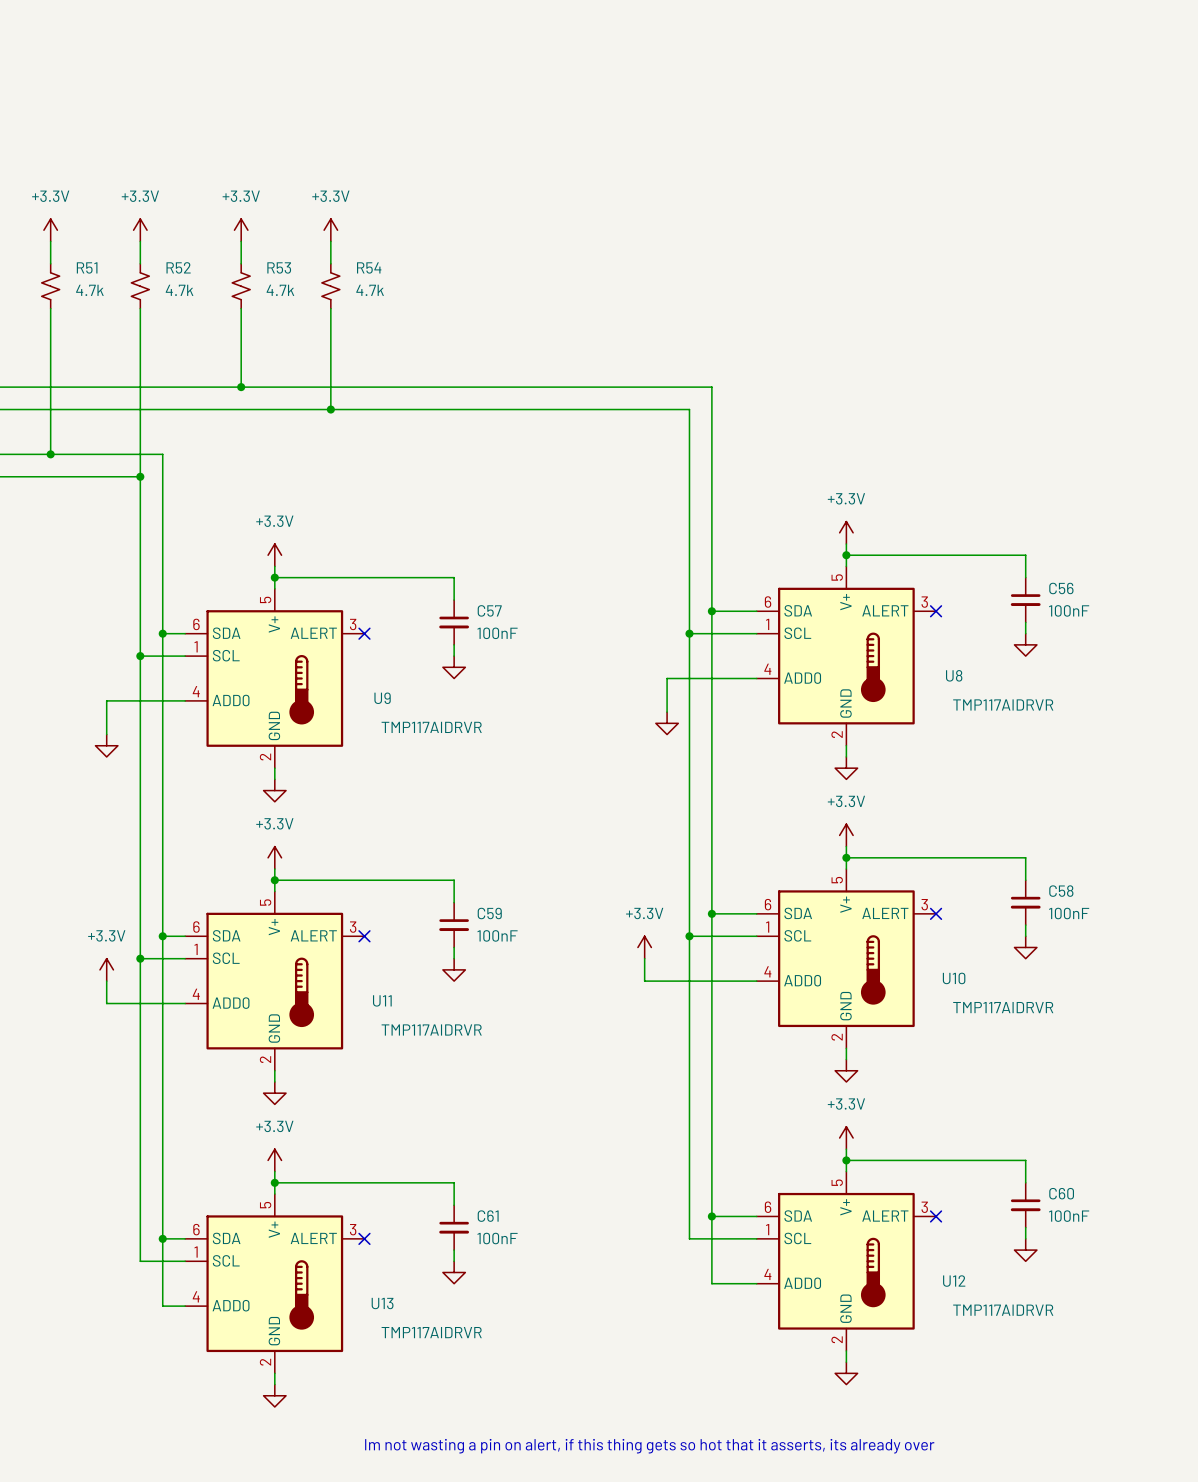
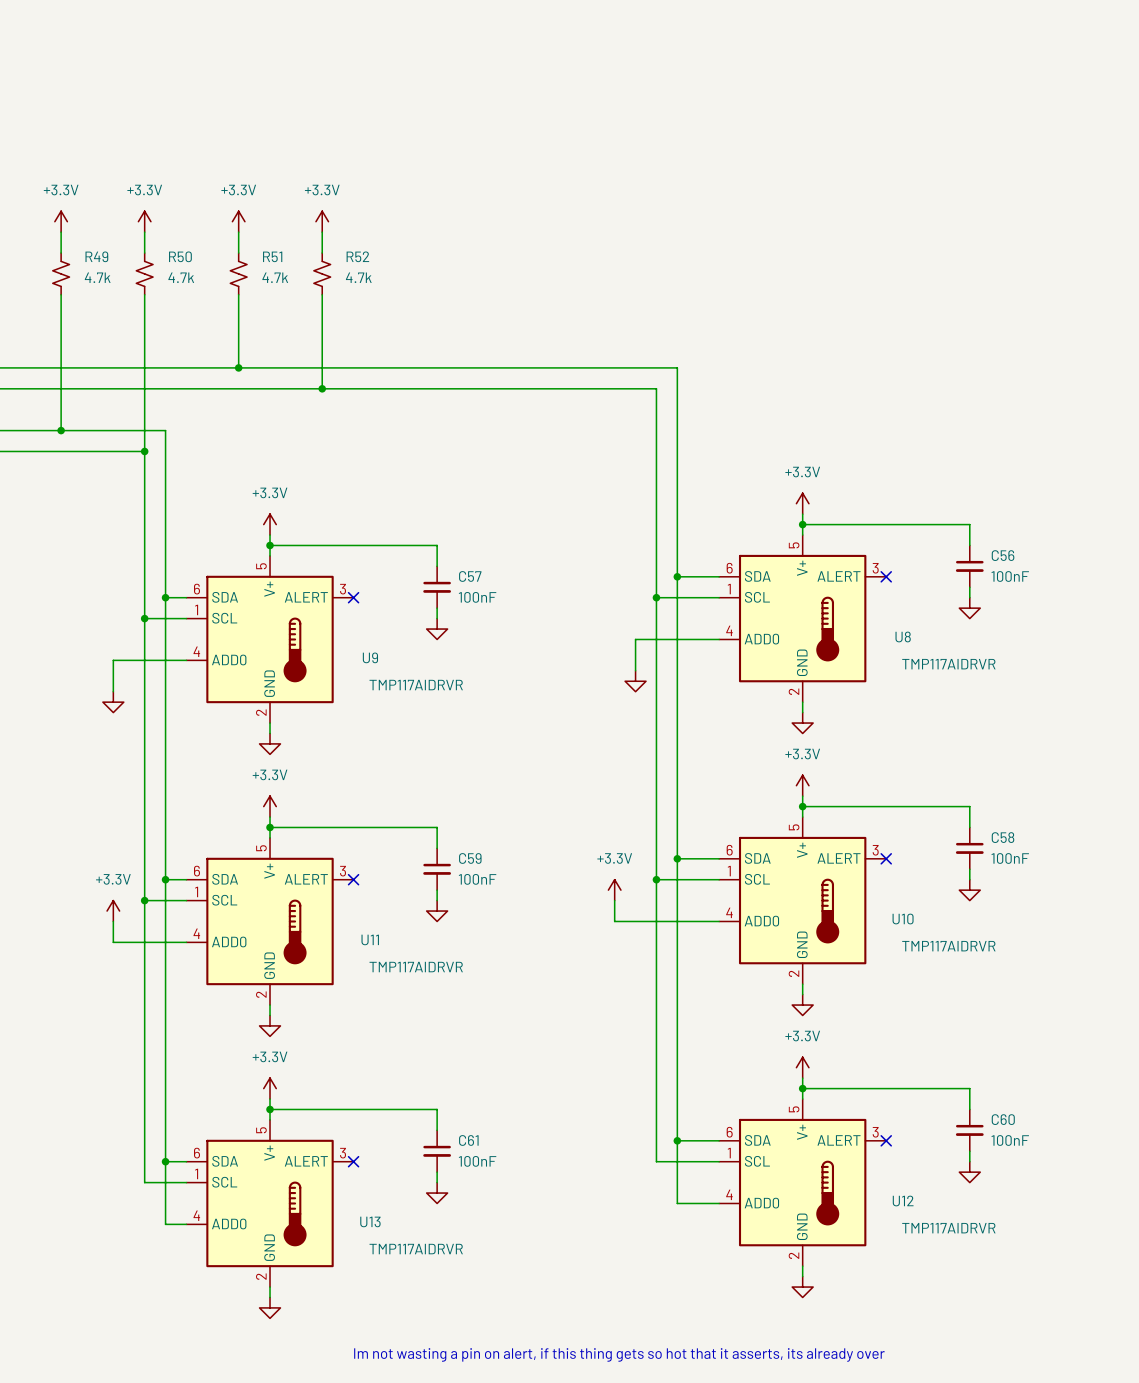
R51 name: R51 (87, 267) -> R49 (96, 256)
R52 name: R52 (178, 267) -> R50 (180, 256)
R53 name: R53 (279, 267) -> R51 (272, 256)
R54 name: R54 (369, 267) -> R52 (357, 256)

